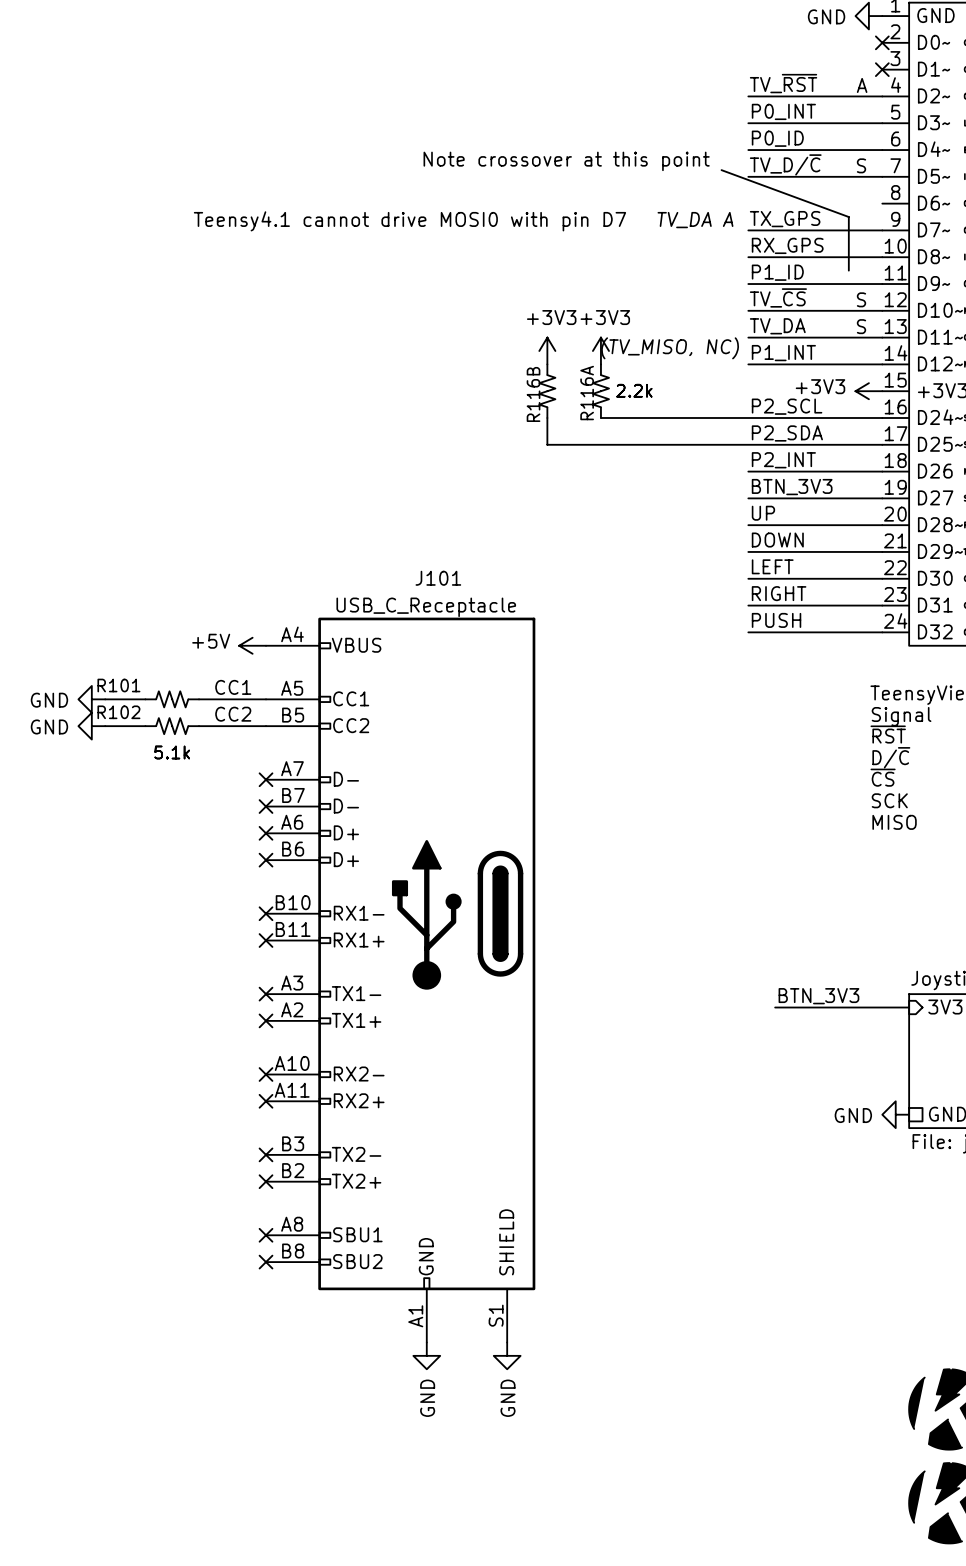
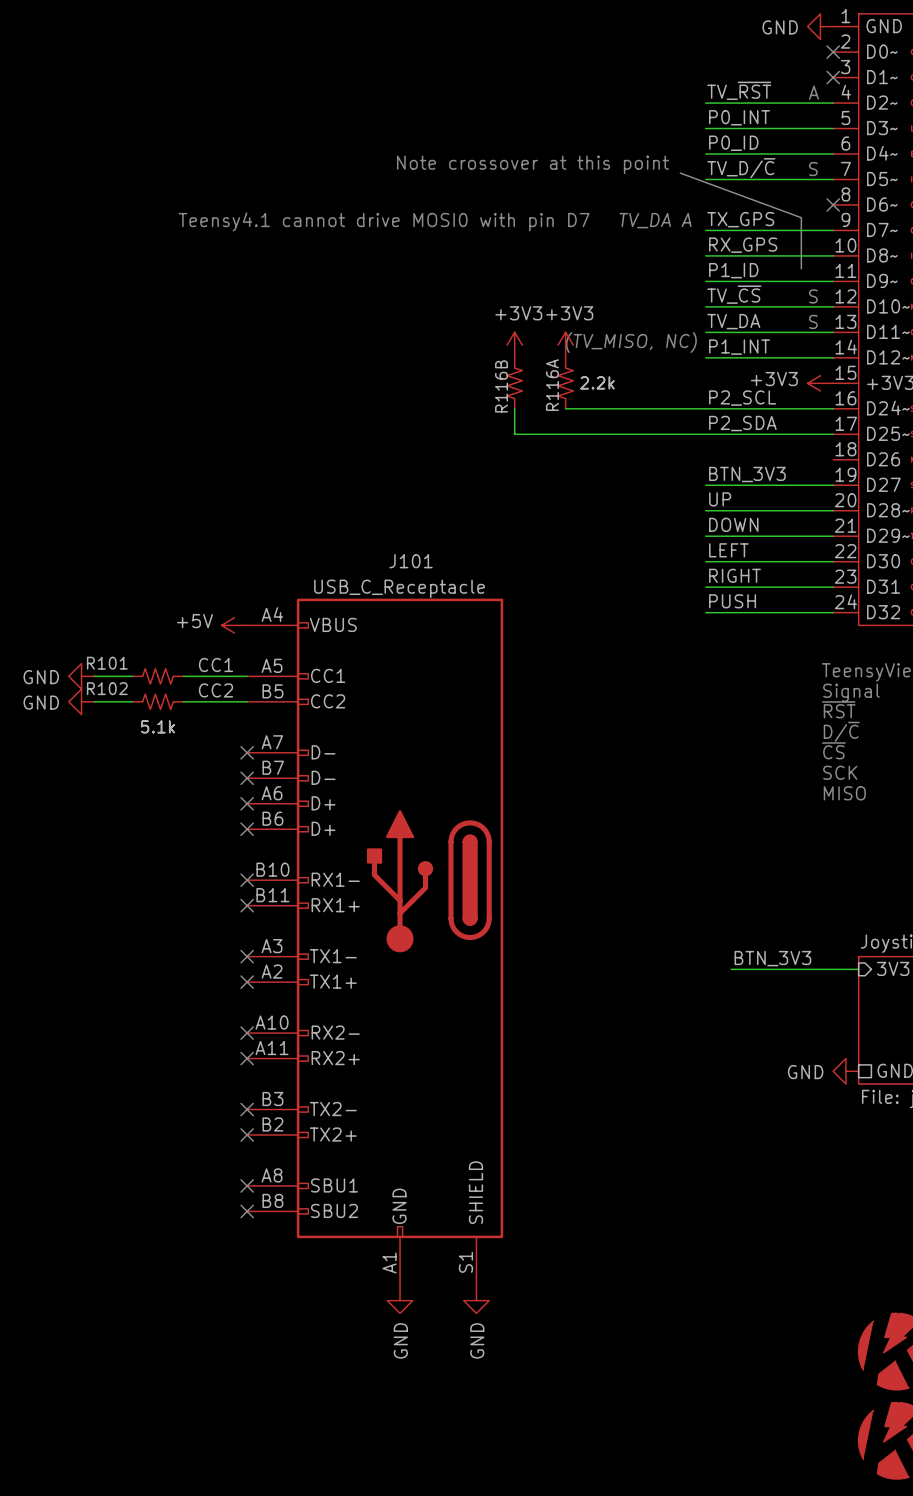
no-connect mark: none -> (833, 204)
label: P2_INT (783, 460) -> none
wire: (748, 471) (882, 471) -> none

